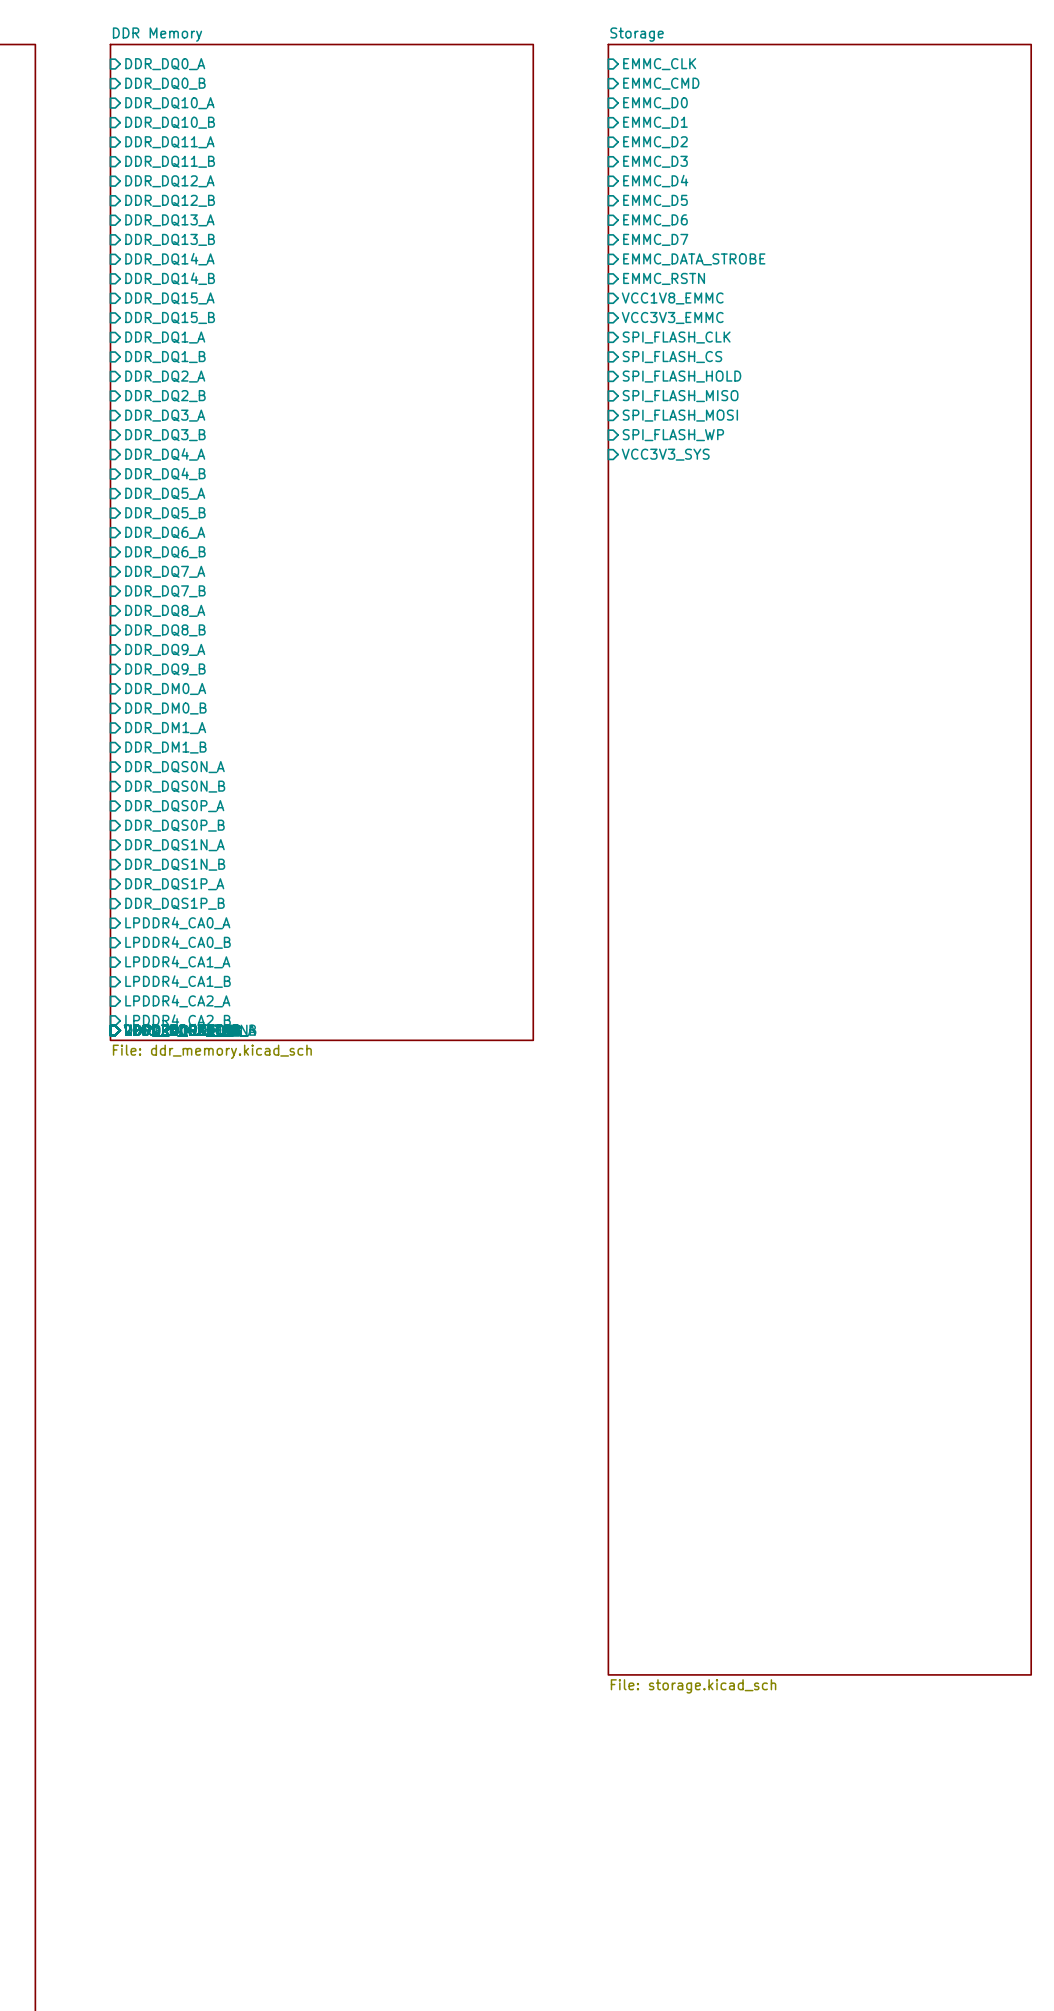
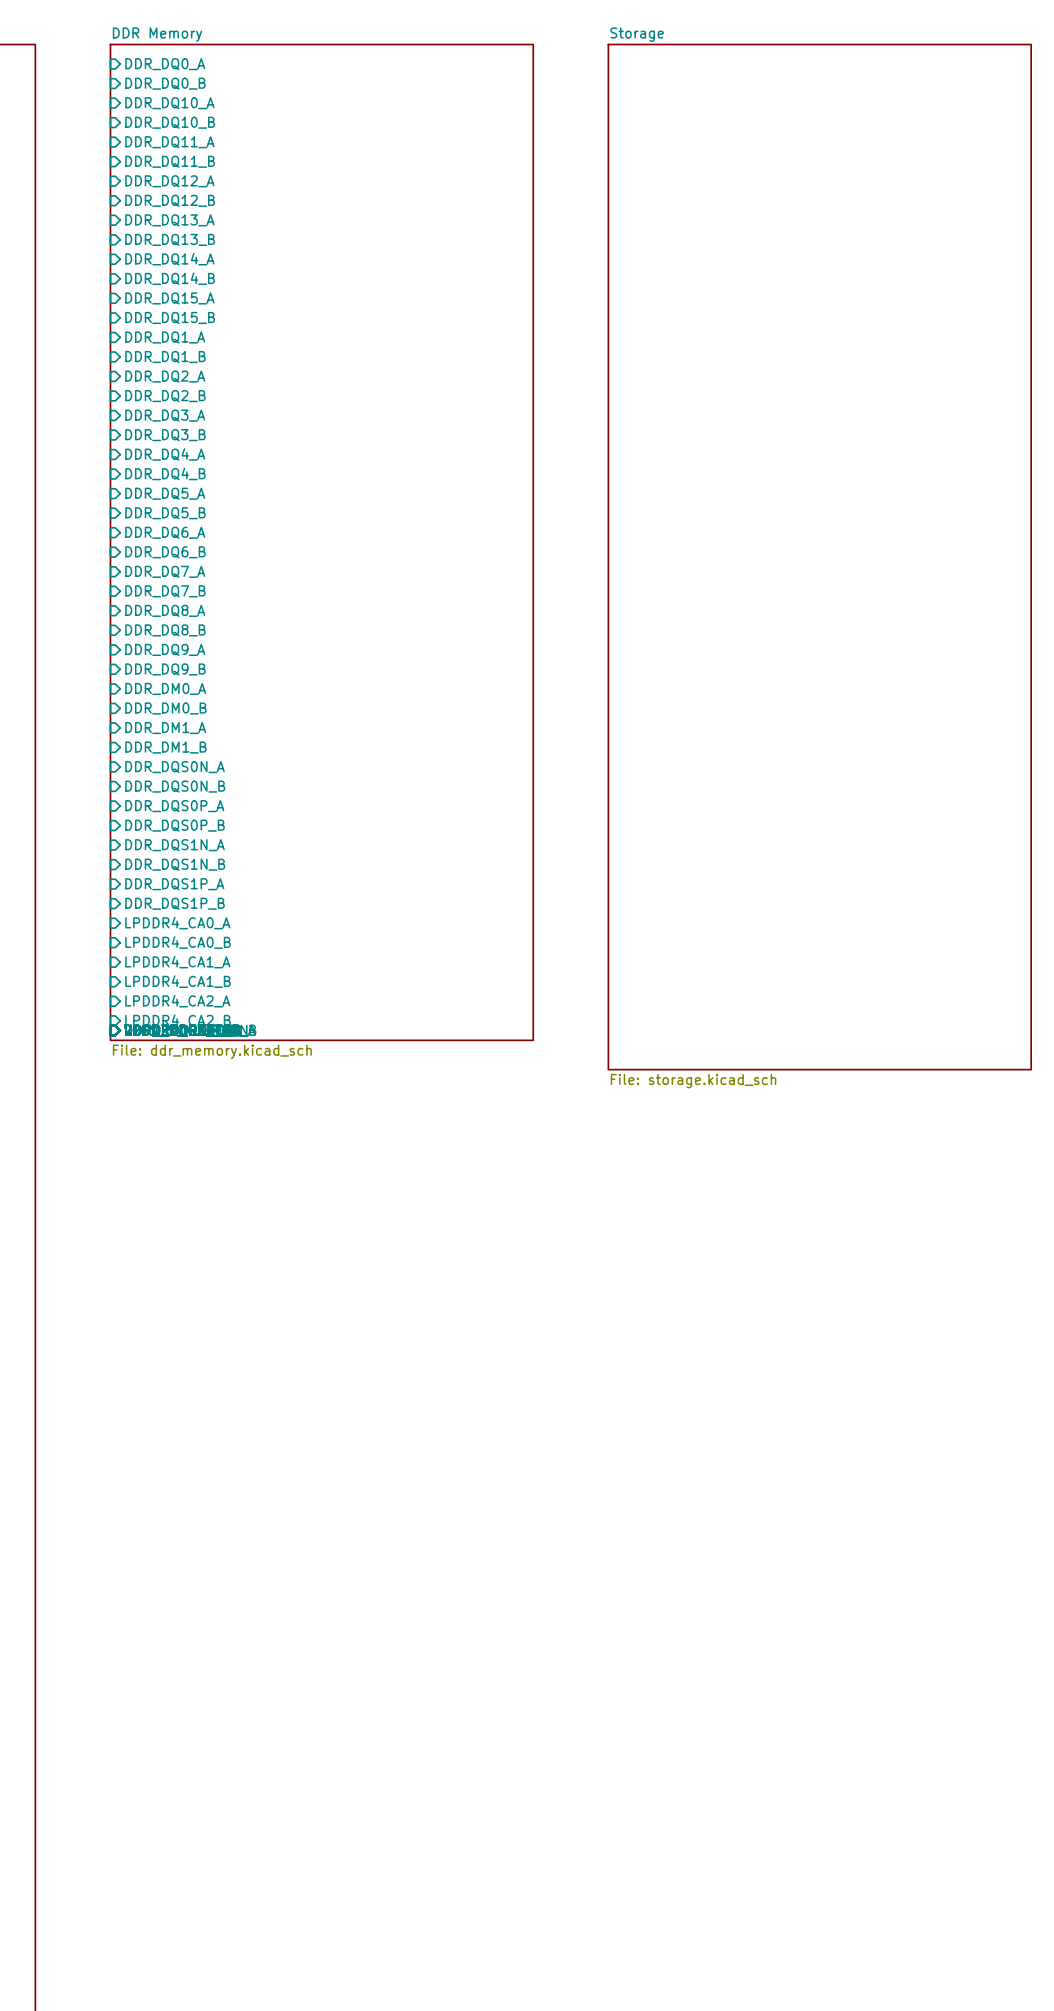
sheet pin: EMMC_CLK (659, 64) -> none
sheet pin: EMMC_CMD (661, 83) -> none
sheet pin: EMMC_D0 (655, 103) -> none
sheet pin: EMMC_D1 (655, 122) -> none
sheet pin: EMMC_D2 (655, 142) -> none
sheet pin: EMMC_D3 (655, 161) -> none
sheet pin: EMMC_D4 (655, 181) -> none
sheet pin: EMMC_D5 (655, 200) -> none
sheet pin: EMMC_D6 (655, 220) -> none
sheet pin: EMMC_D7 (655, 239) -> none
sheet pin: EMMC_DATA_STROBE (694, 259) -> none
sheet pin: EMMC_RSTN (664, 278) -> none
sheet pin: VCC1V8_EMMC (672, 298) -> none
sheet pin: VCC3V3_EMMC (672, 317) -> none
sheet pin: SPI_FLASH_CLK (676, 337) -> none
sheet pin: SPI_FLASH_CS (672, 357) -> none
sheet pin: SPI_FLASH_HOLD (681, 376) -> none
sheet pin: SPI_FLASH_MISO (680, 396) -> none
sheet pin: SPI_FLASH_MOSI (680, 415) -> none
sheet pin: SPI_FLASH_WP (673, 435) -> none
sheet pin: VCC3V3_SYS (665, 454) -> none
sheet Storage: none -> File: storage.kicad_sch (819, 557)
sheet Storage: File: storage.kicad_sch (819, 859) -> none

